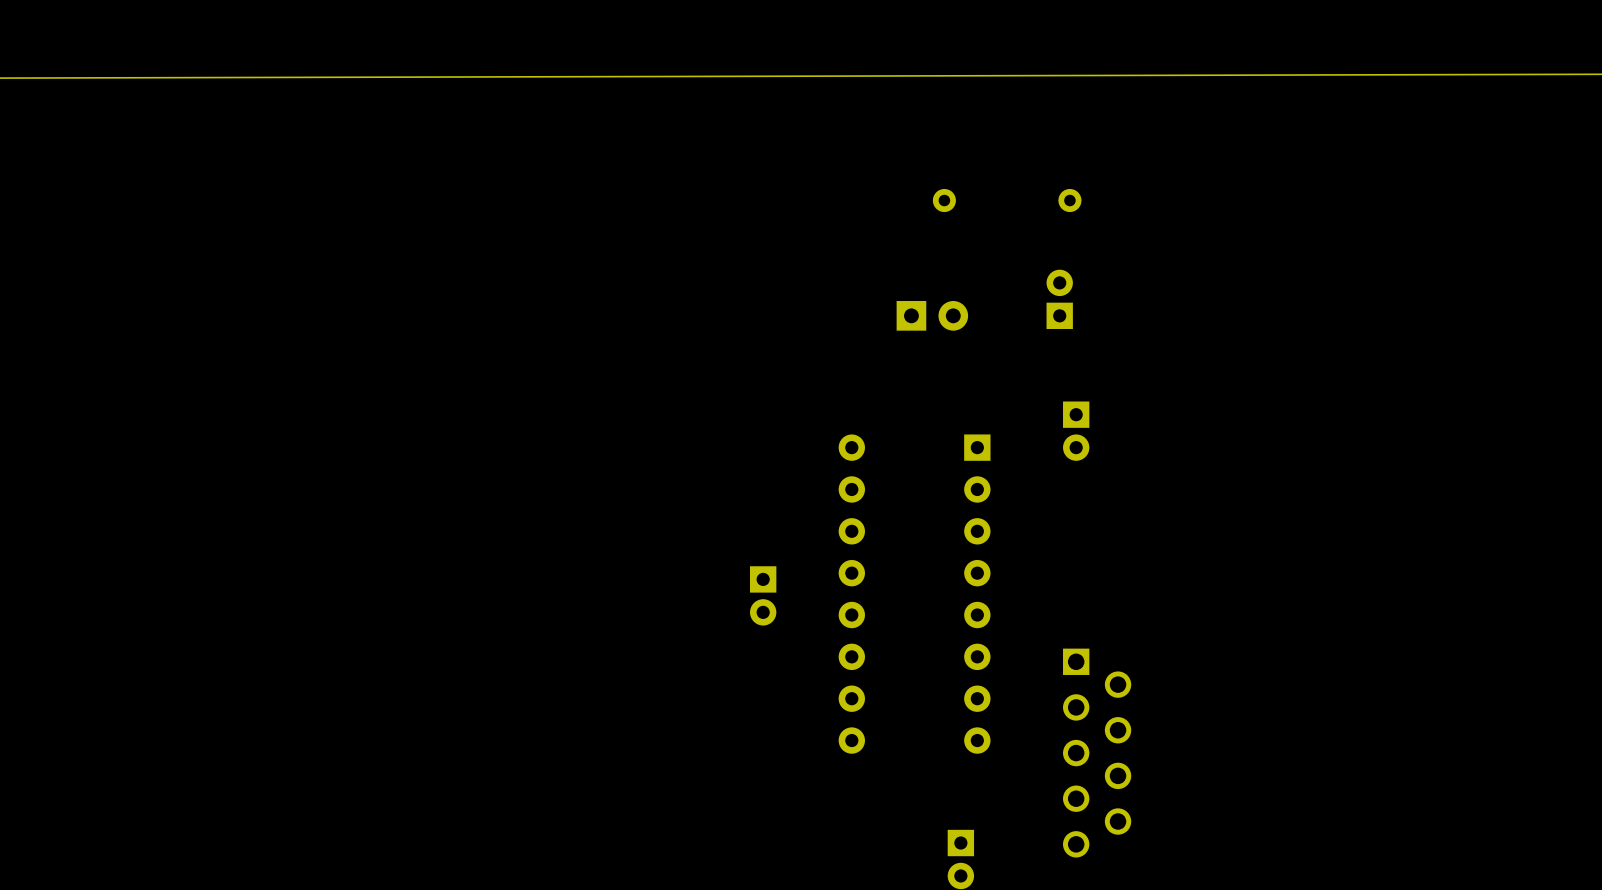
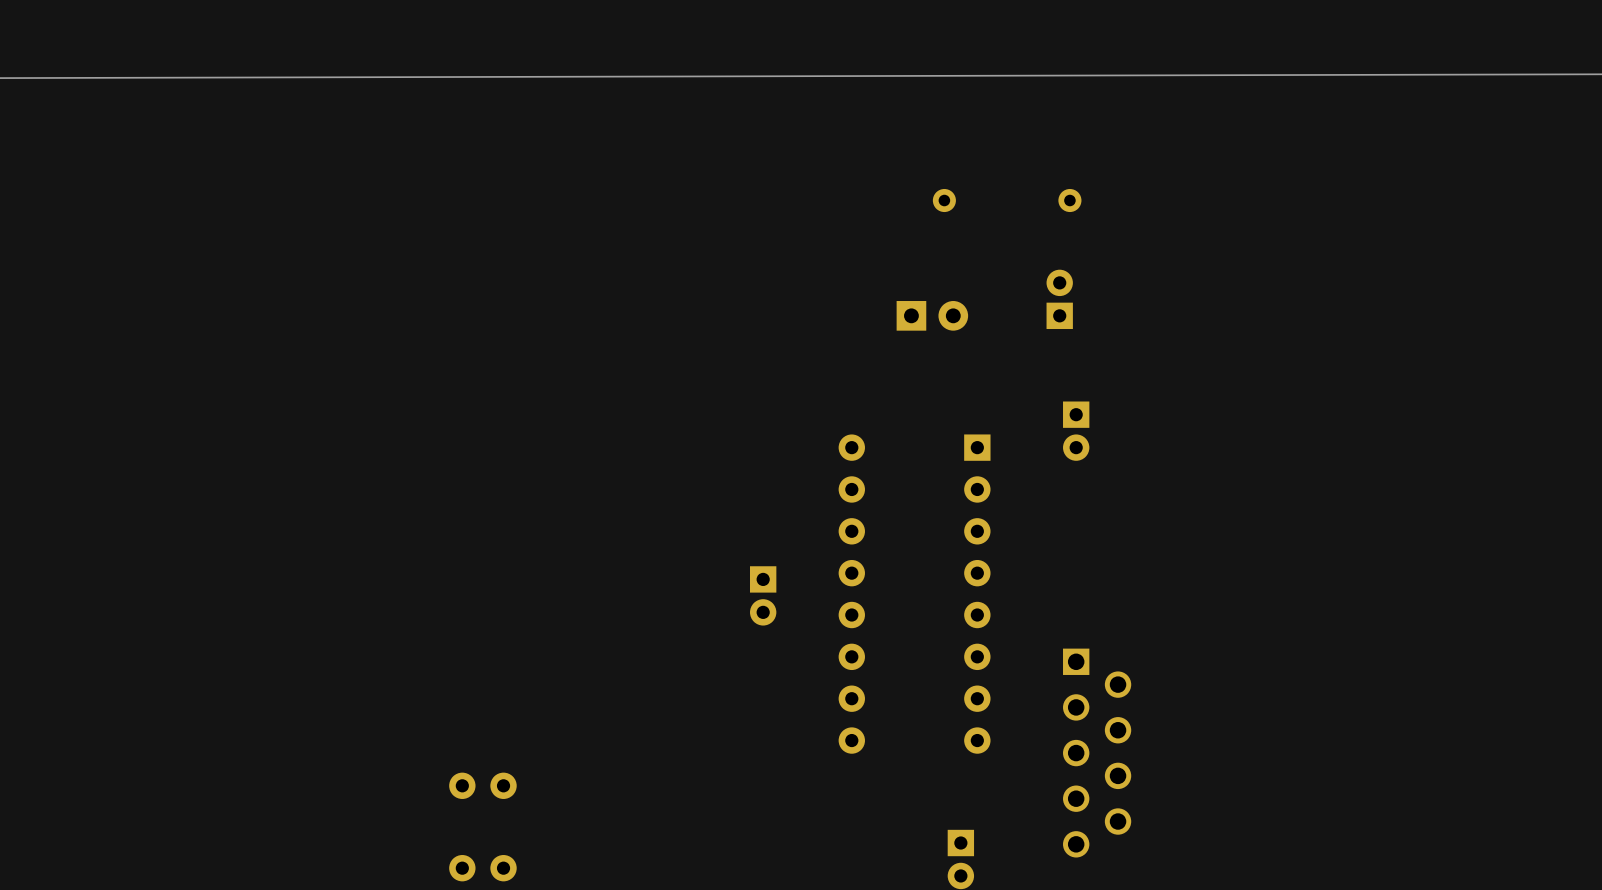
part: none -> (482, 785)
part: none -> (482, 868)

